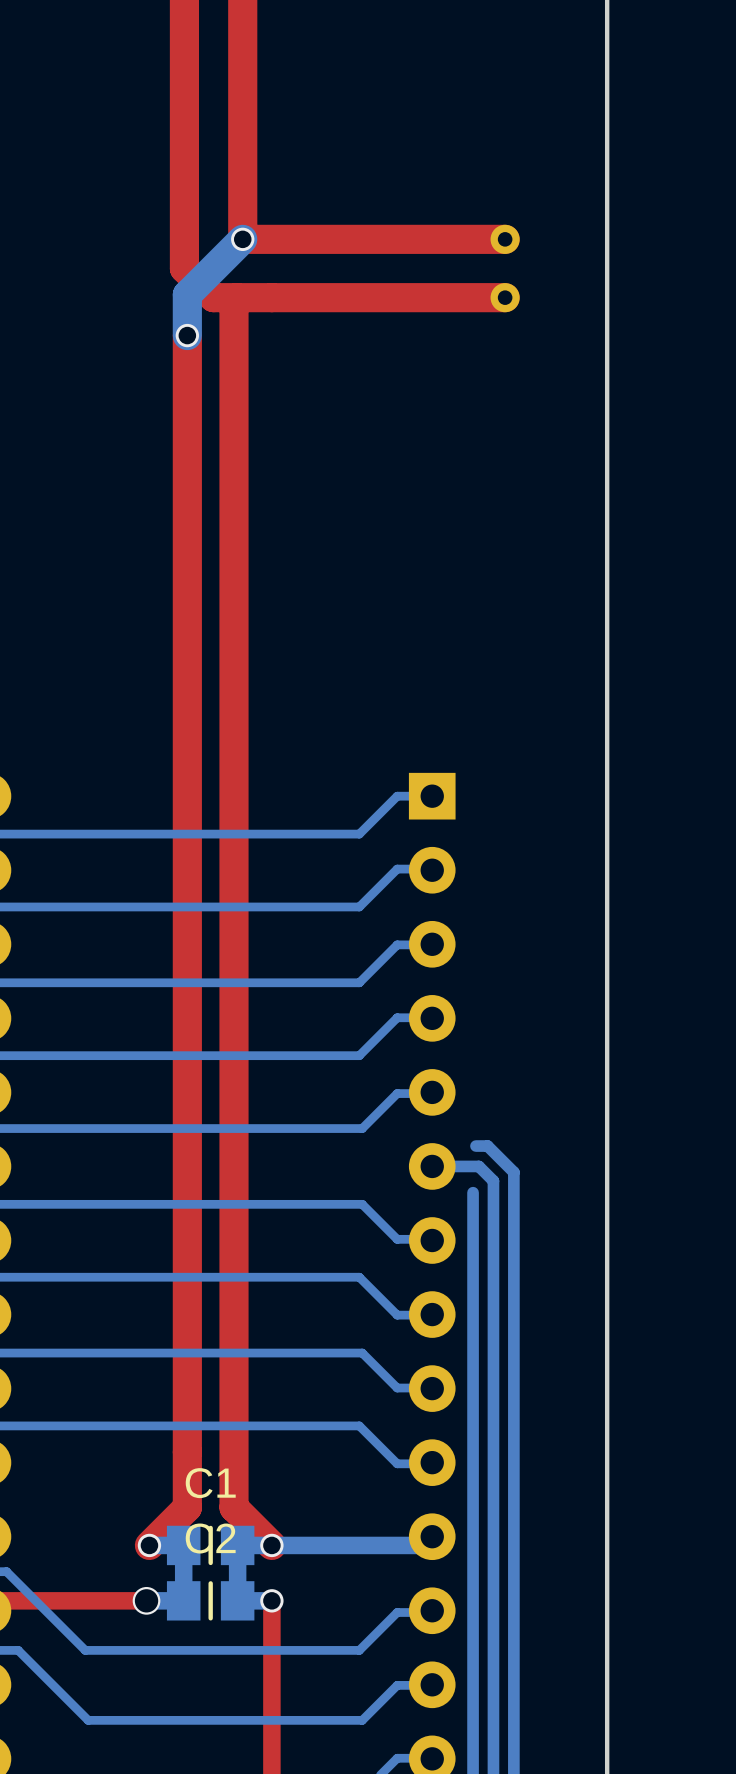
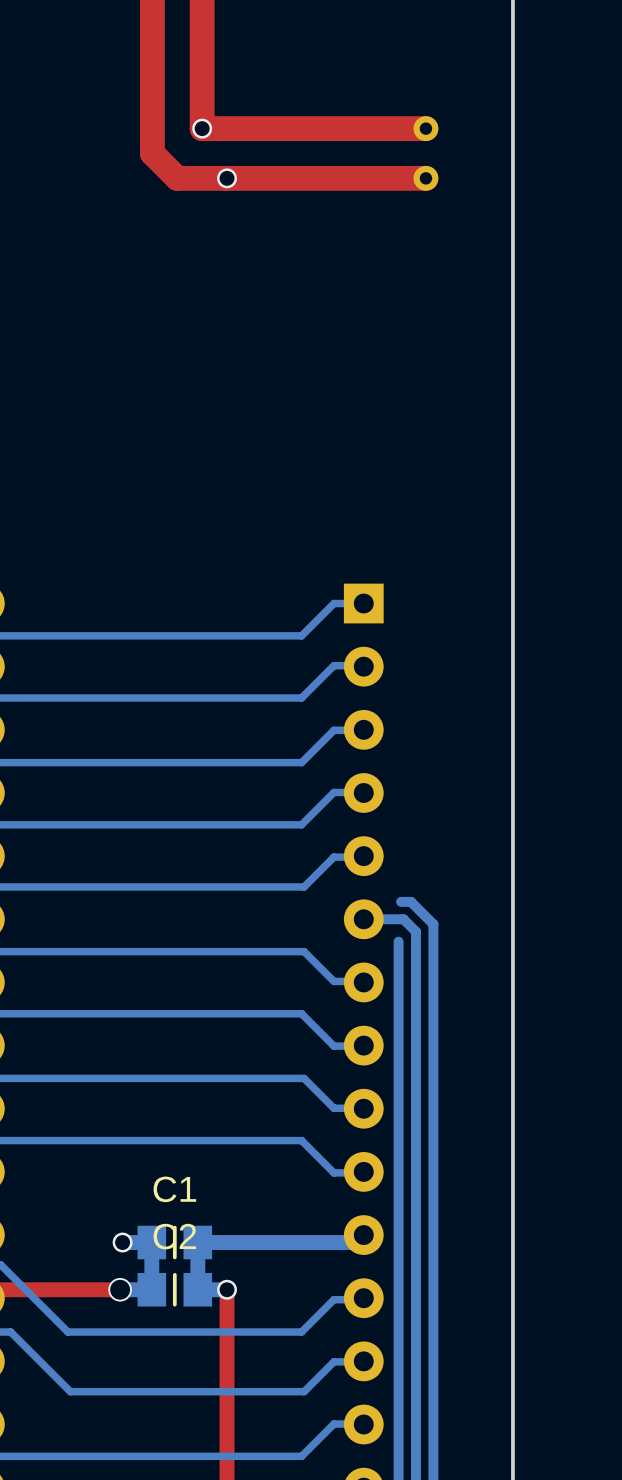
bottom track: (242, 239) (187, 294) (187, 335) -> none
top track: (236, 297) (233, 300) (233, 1507) (271, 1545) -> none
top track: (187, 335) (187, 1507) (149, 1545) -> none
via position: (187, 335) -> (227, 178)
via: (271, 1545) -> none

